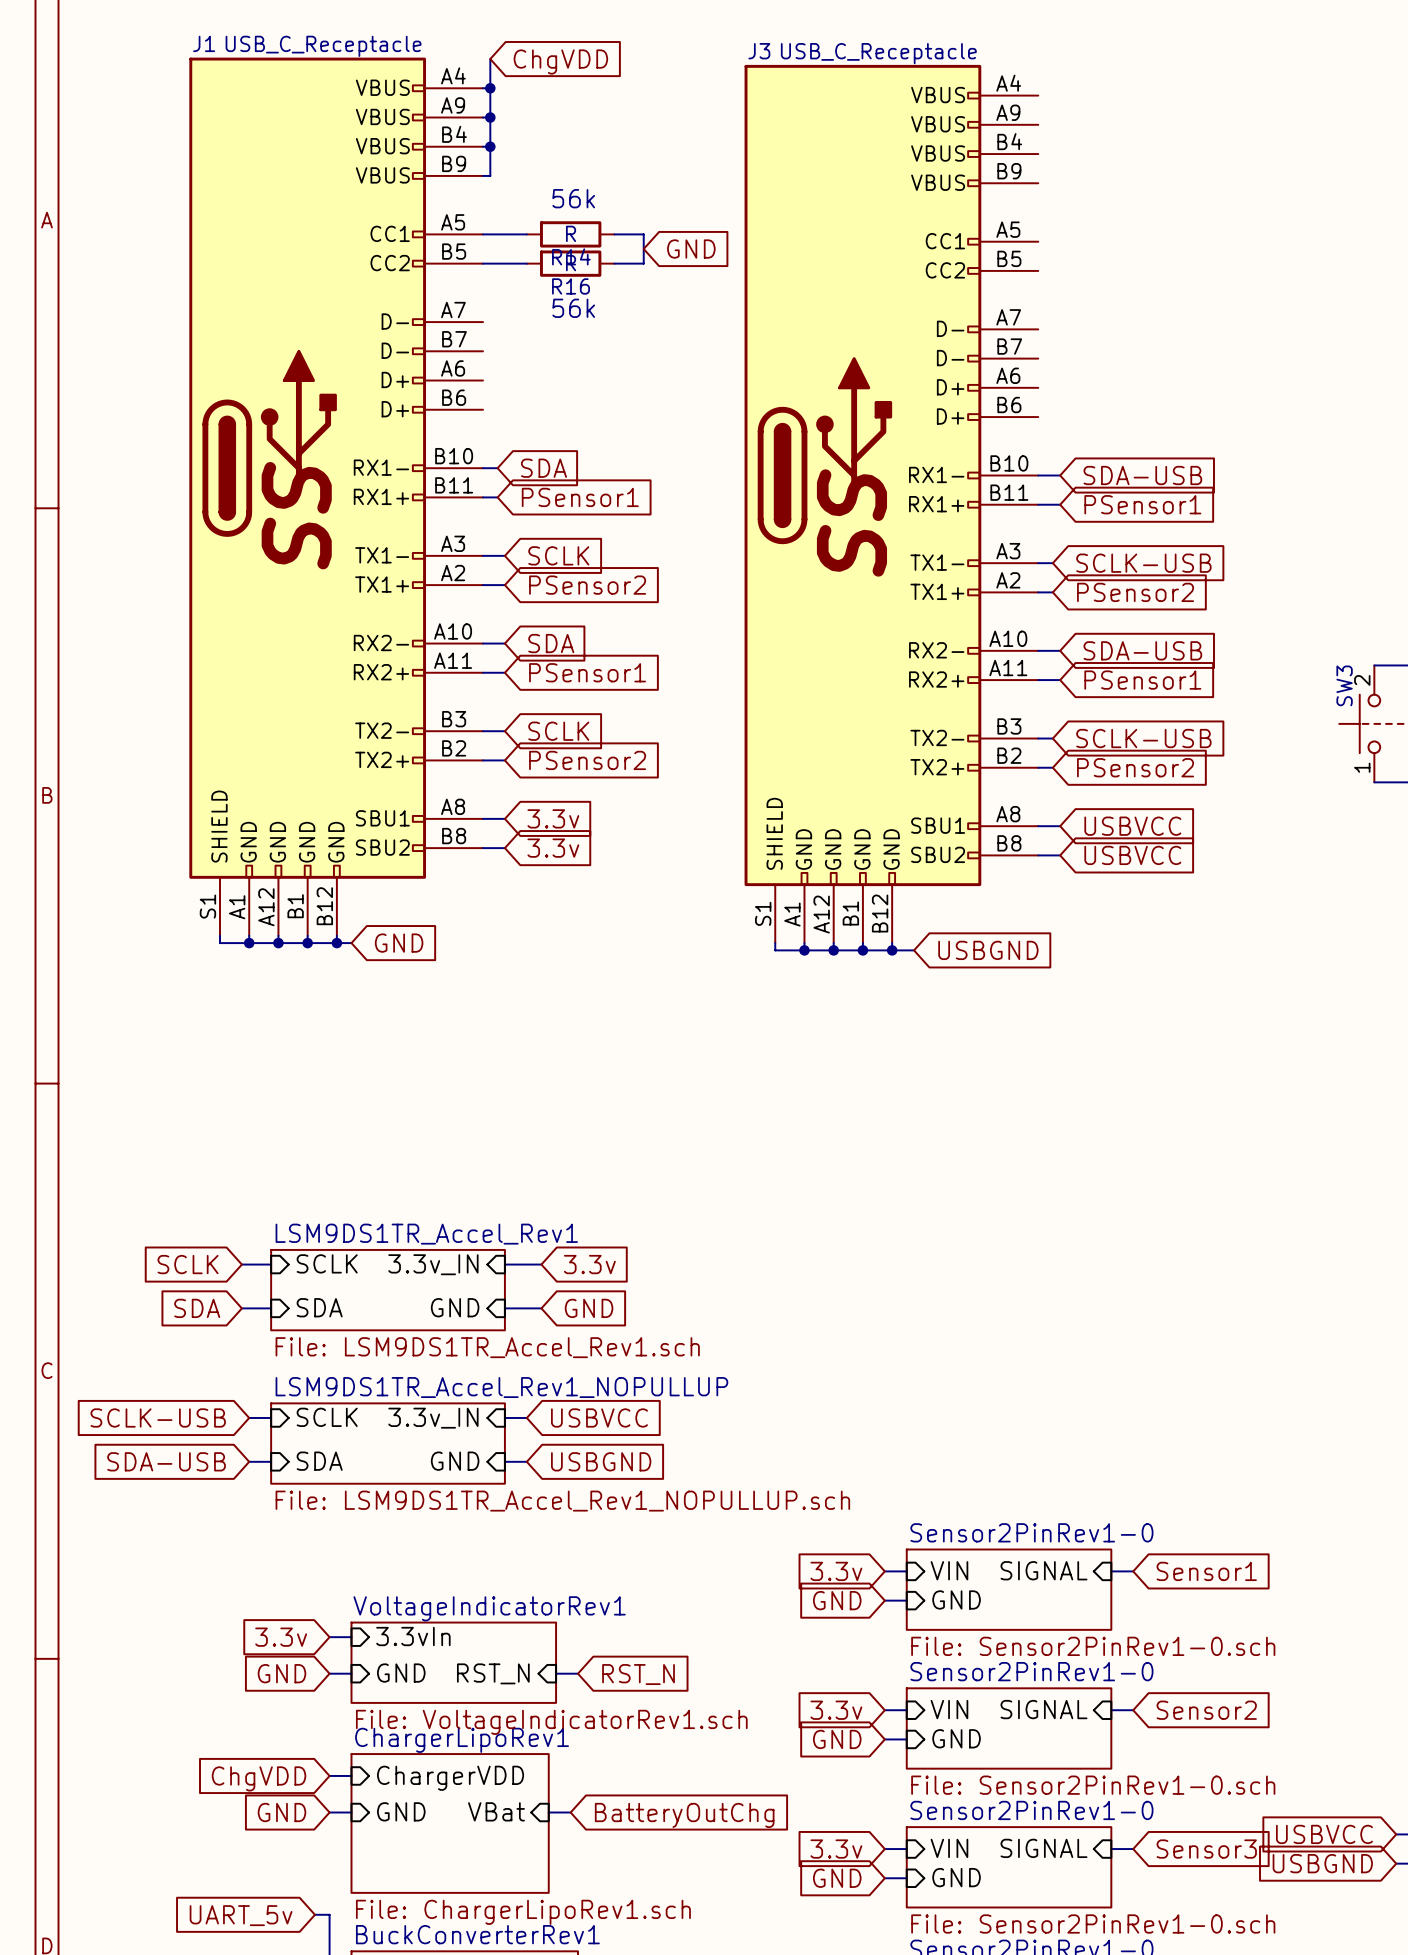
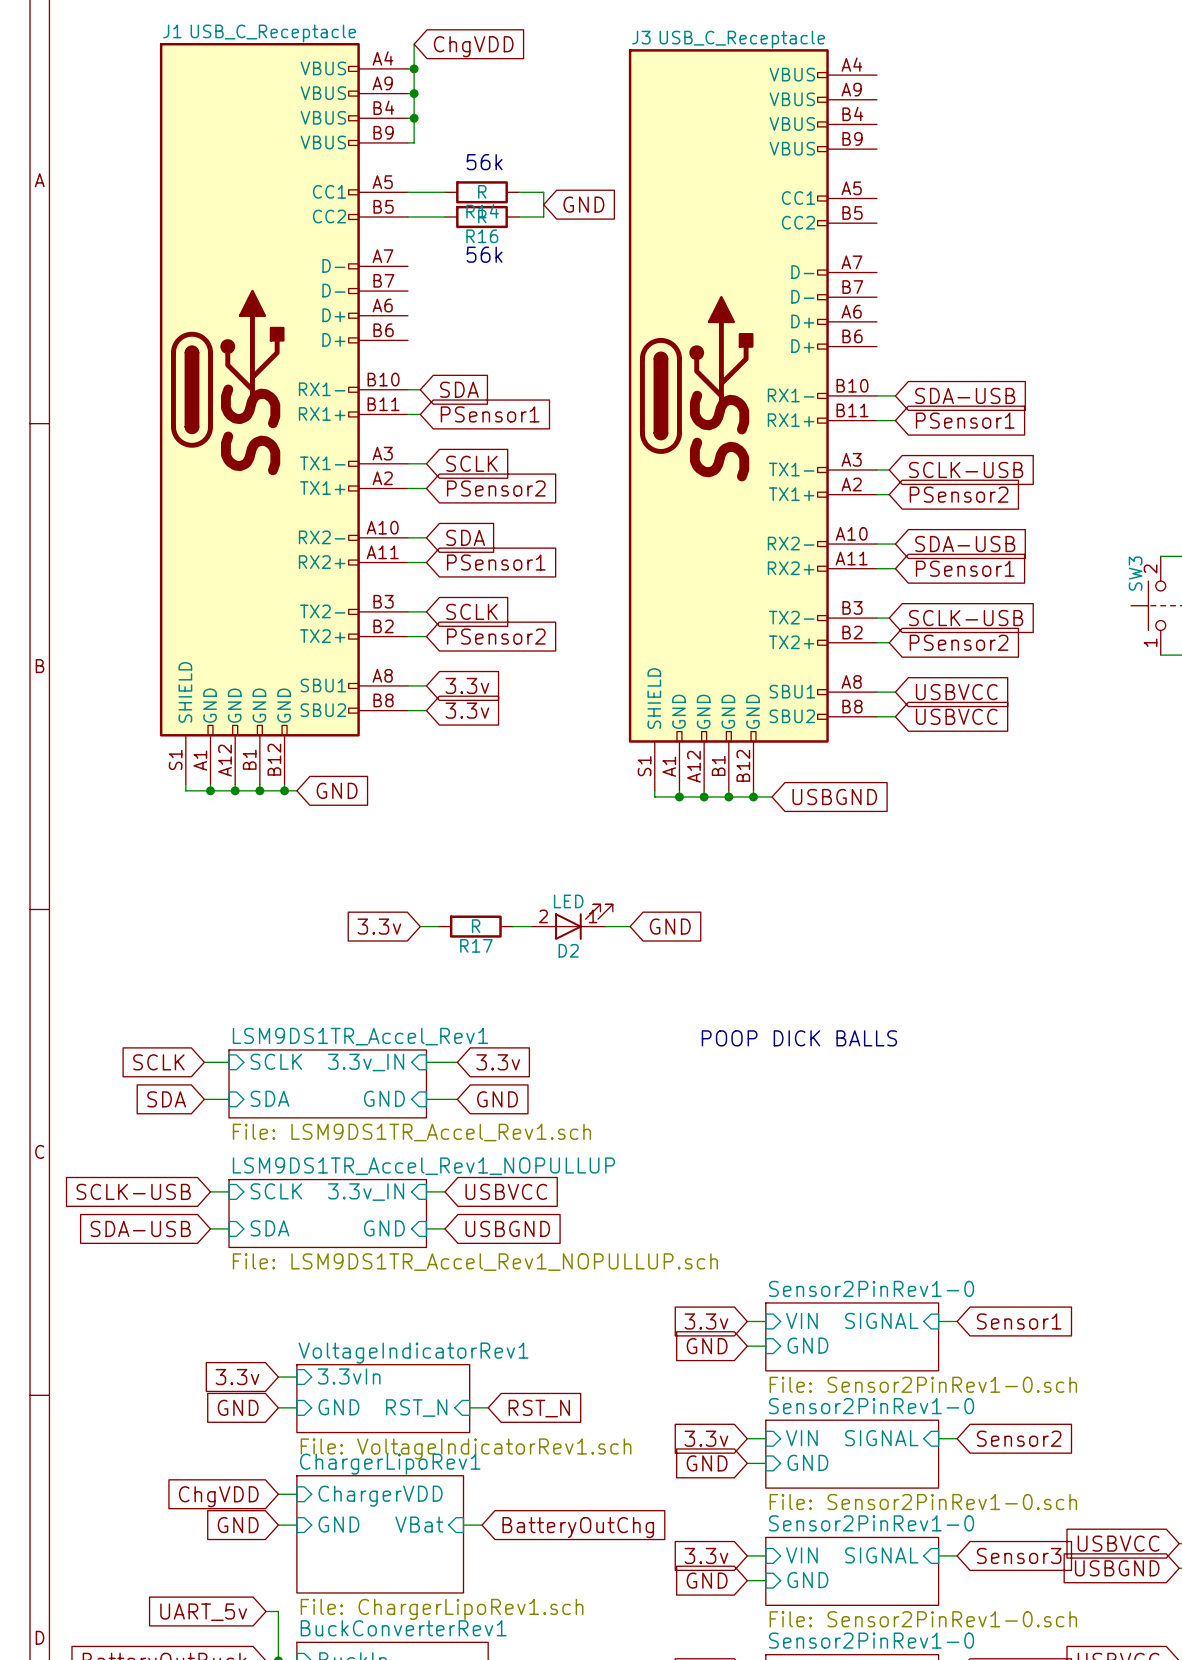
D2: none -> LED (572, 922)
global label: none -> 3.3v (379, 926)
wire: none -> (420, 926) (438, 926)
R17: none -> R (475, 926)
wire: none -> (512, 926) (531, 926)
wire: none -> (605, 926) (630, 926)
global label: none -> GND (670, 926)
text: none -> POOP DICK BALLS (799, 1038)

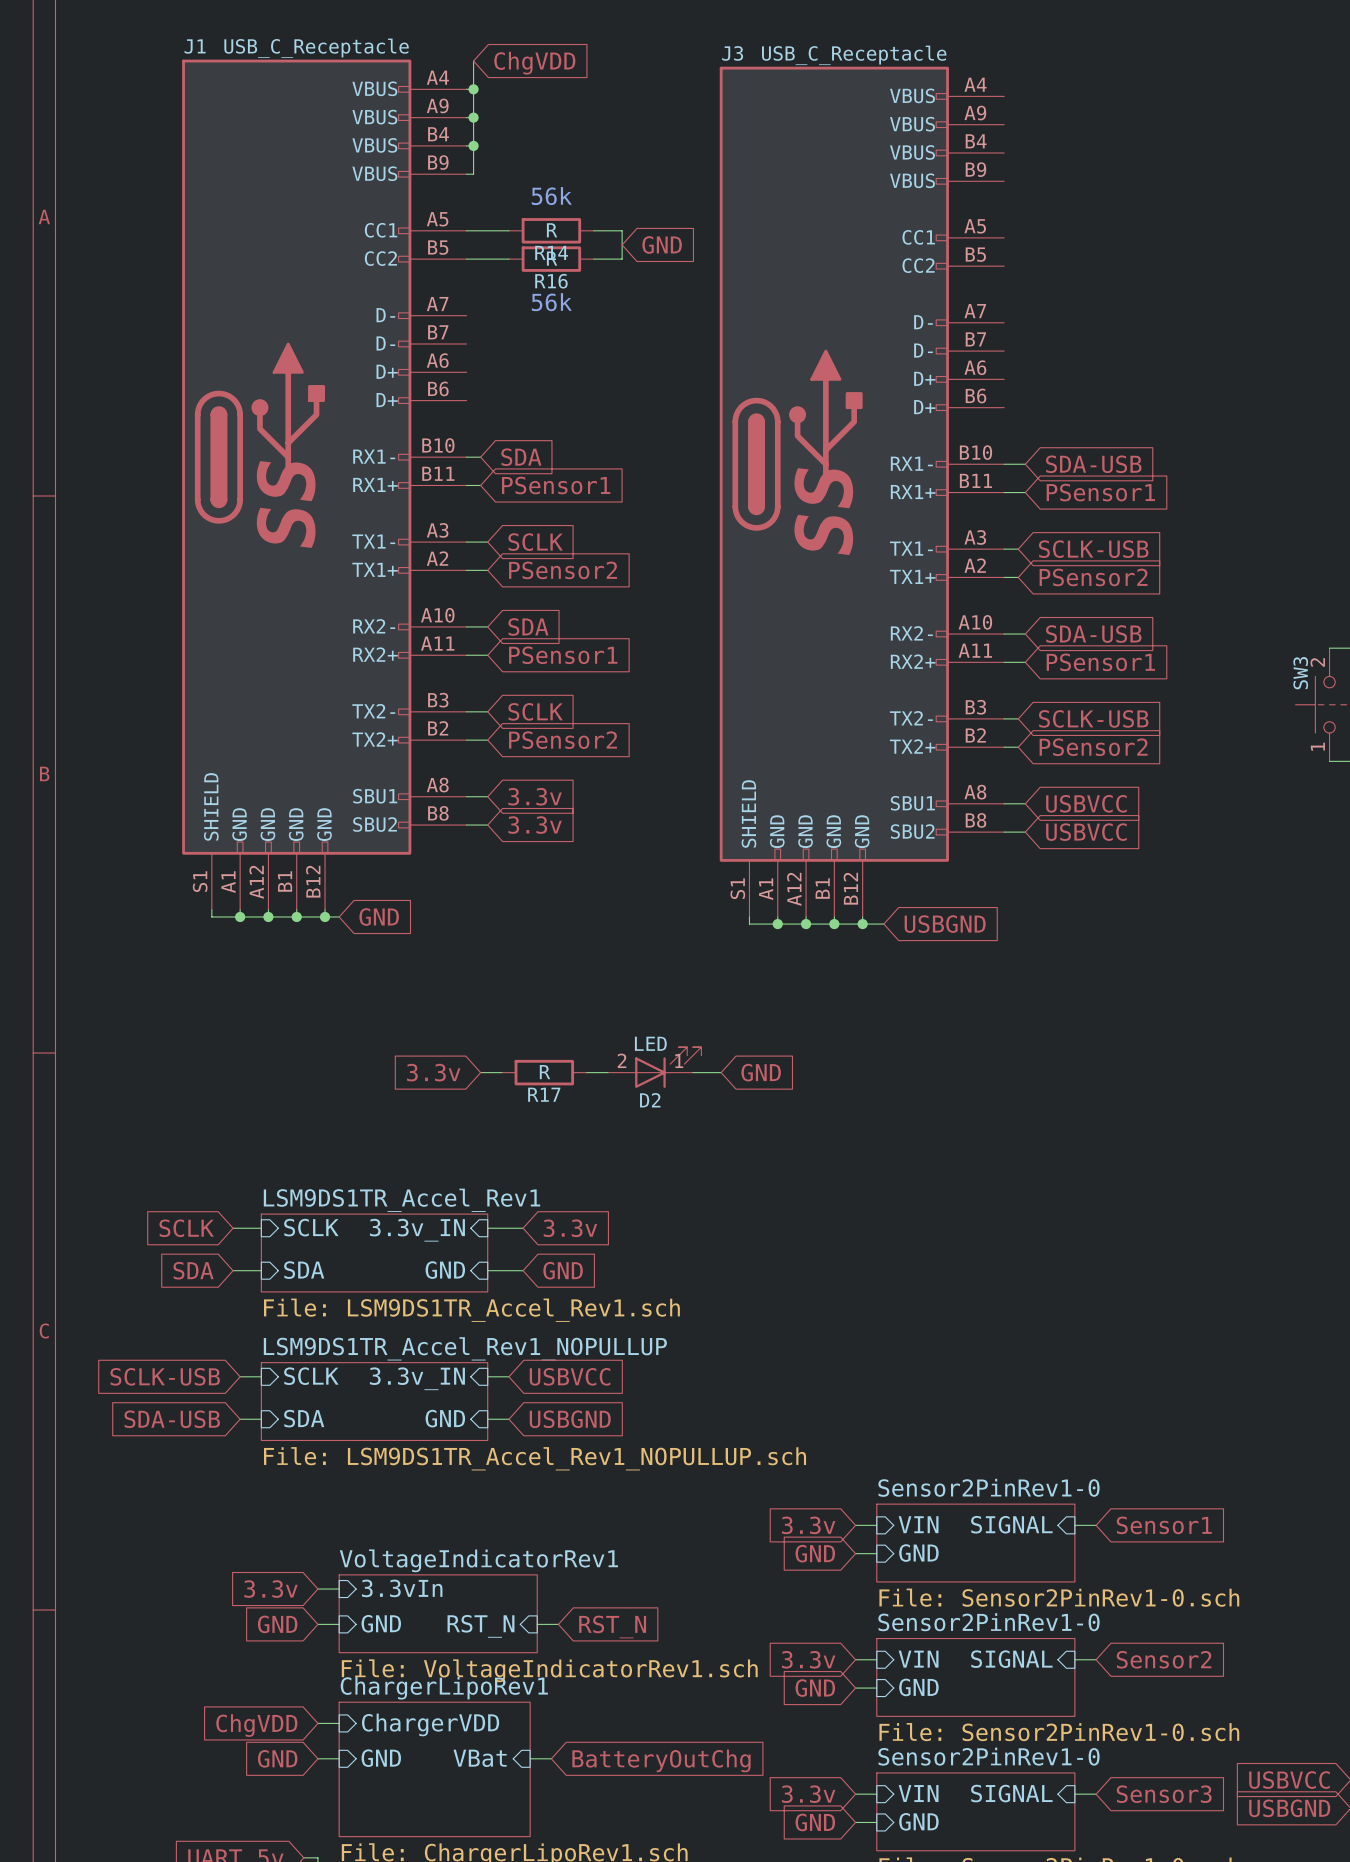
text: POOP DICK BALLS (799, 1038) -> none

